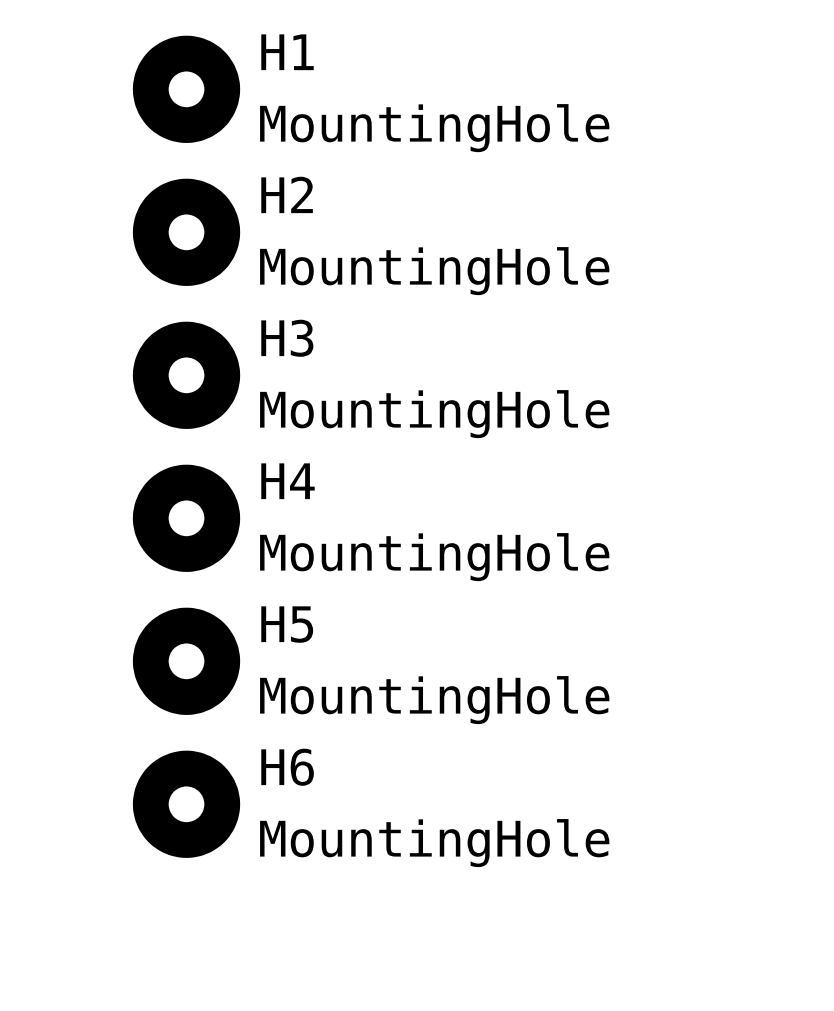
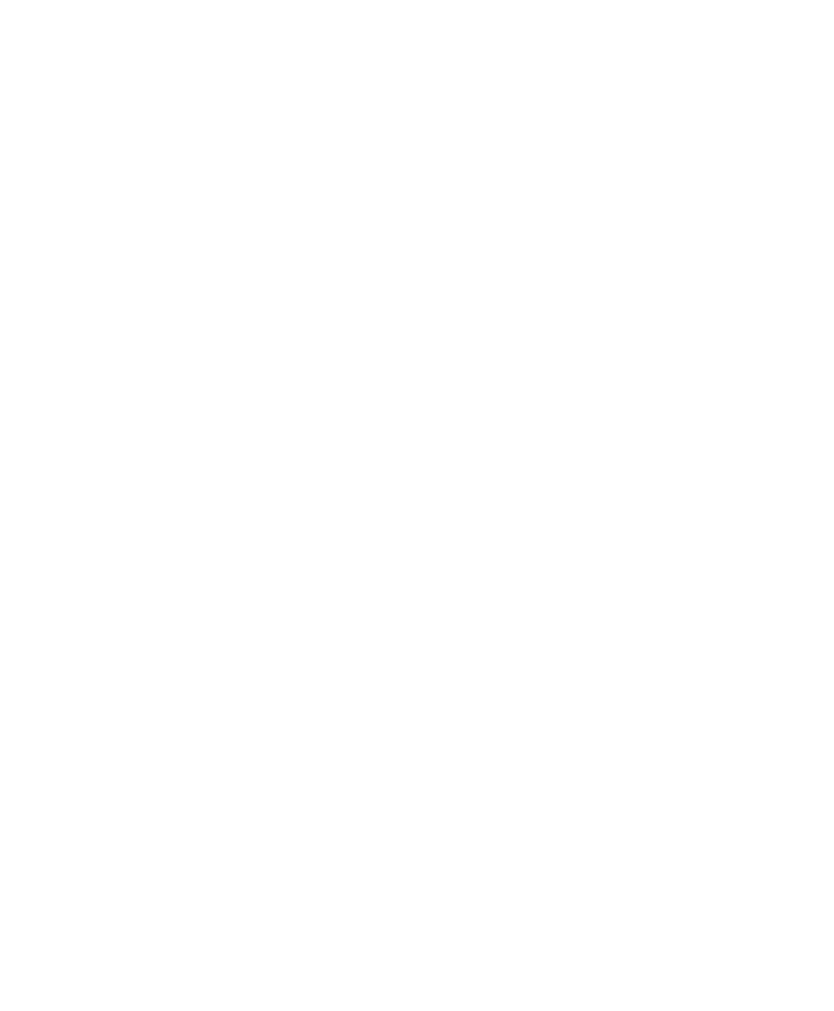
H1: MountingHole (186, 89) -> none
H2: MountingHole (186, 232) -> none
H3: MountingHole (186, 375) -> none
H4: MountingHole (186, 518) -> none
H5: MountingHole (186, 661) -> none
H6: MountingHole (186, 804) -> none

